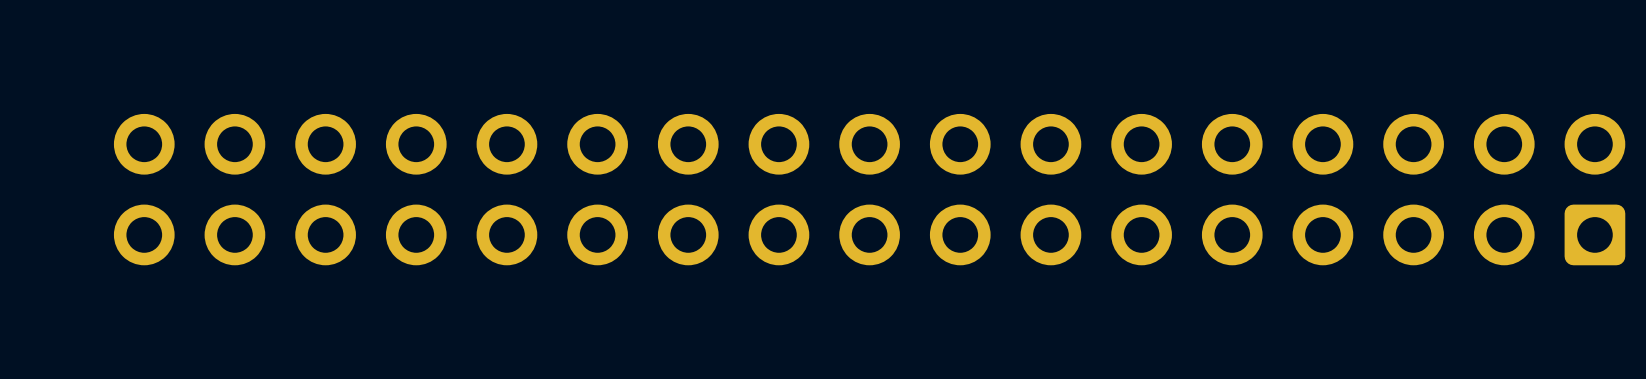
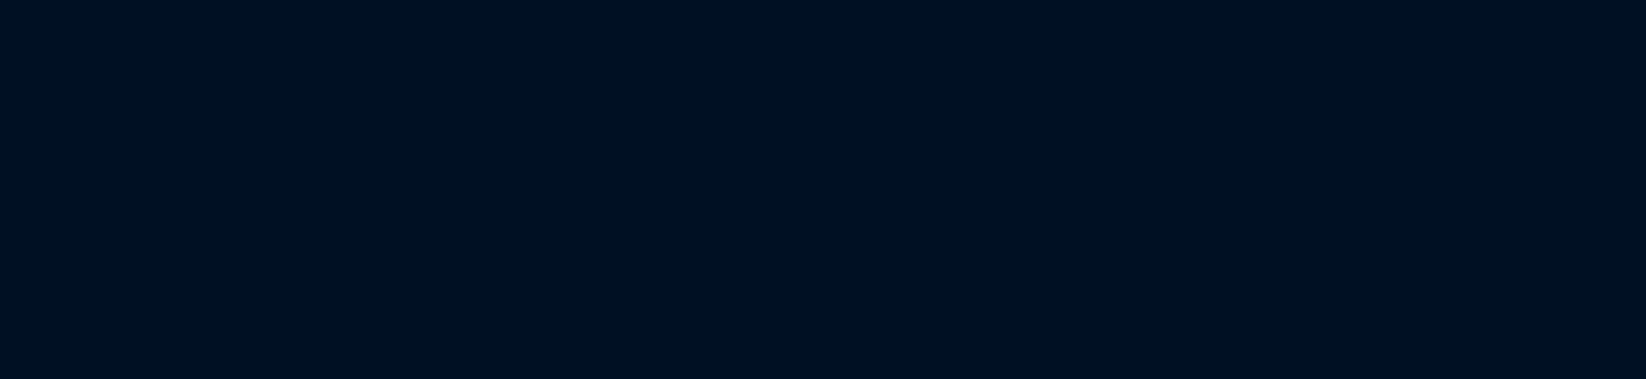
part: (869, 189) -> none

